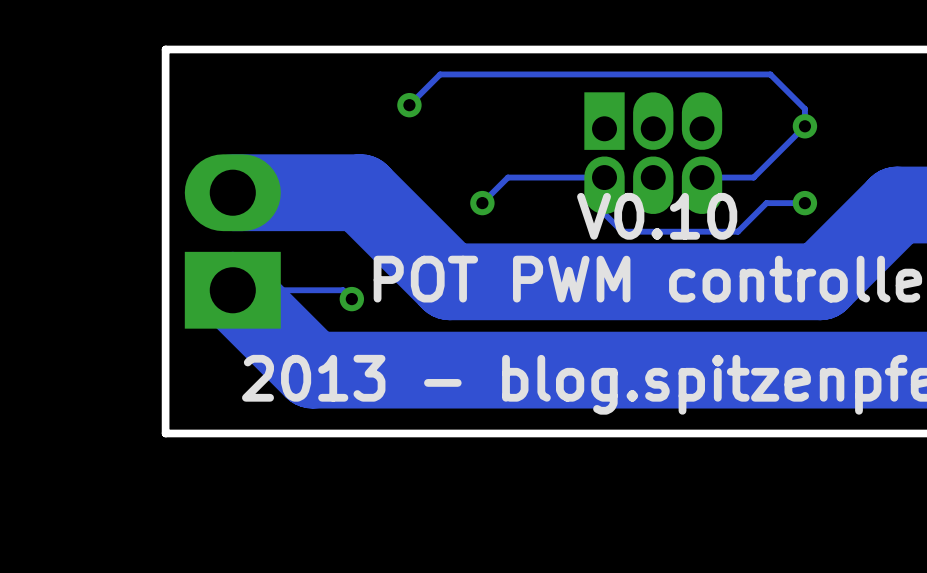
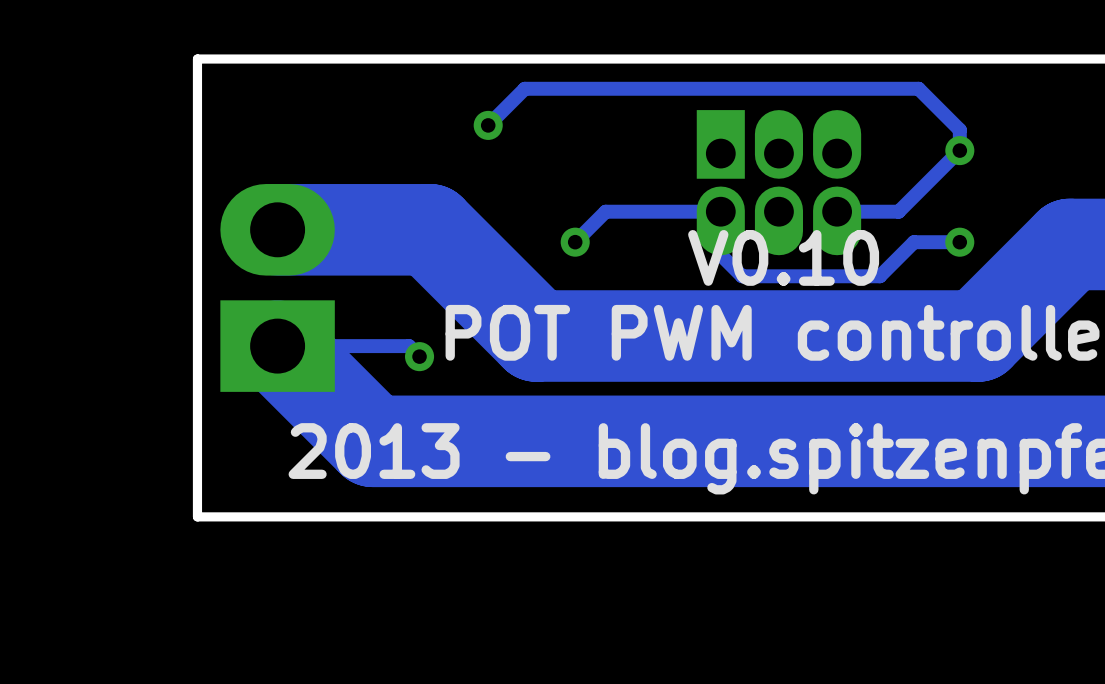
track width: thin (409, 105) (440, 74) (770, 74) (804, 109) (804, 126) (753, 177) (702, 177) -> thick (488, 125) (524, 88) (918, 88) (959, 129) (959, 150) (898, 211) (837, 211)
track width: thin (804, 203) (766, 203) (737, 231) (622, 231) (604, 213) (604, 177) (507, 177) (482, 203) -> thick (959, 242) (913, 242) (879, 276) (742, 276) (720, 254) (720, 211) (605, 211) (575, 242)
track width: thin (232, 290) (343, 290) (351, 299) -> thick (277, 346) (409, 346) (419, 356)

